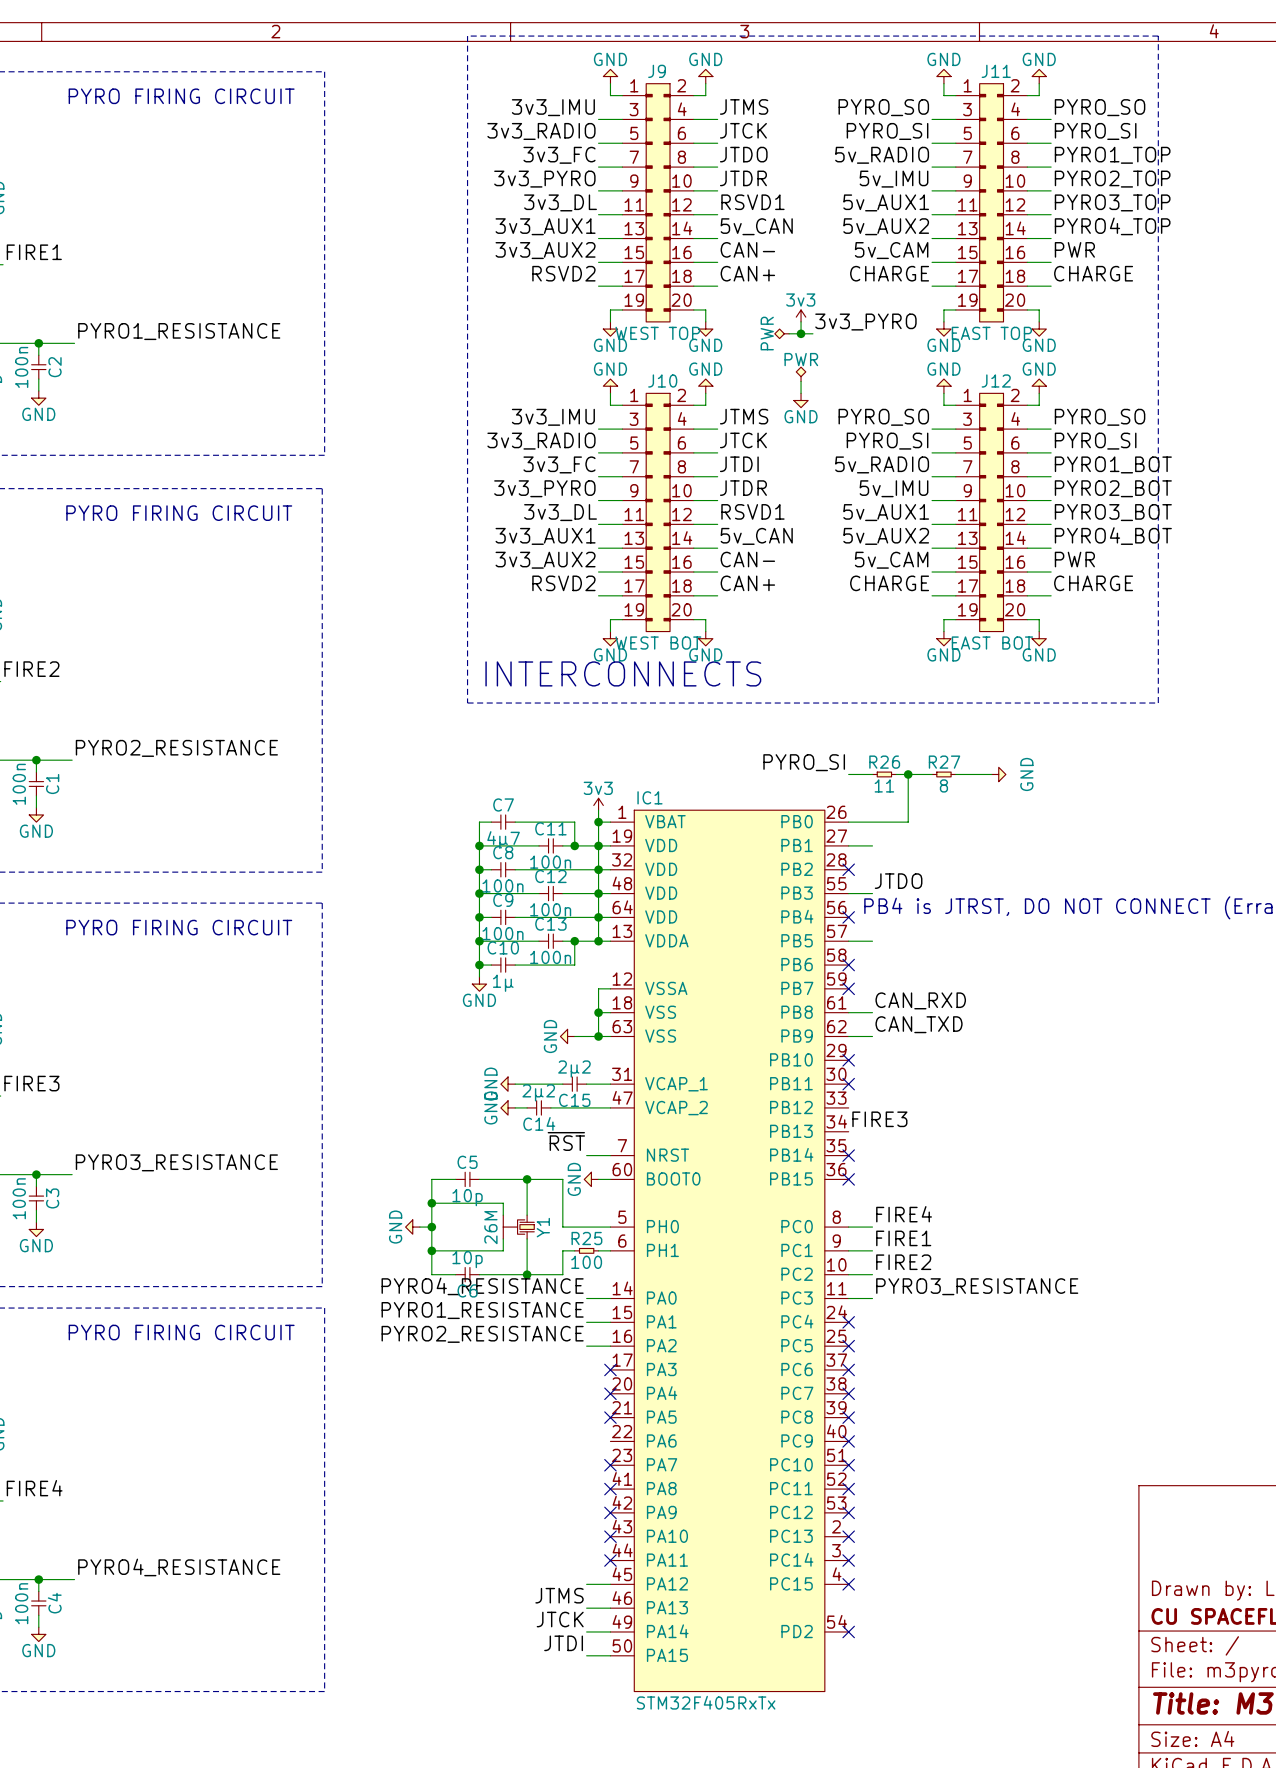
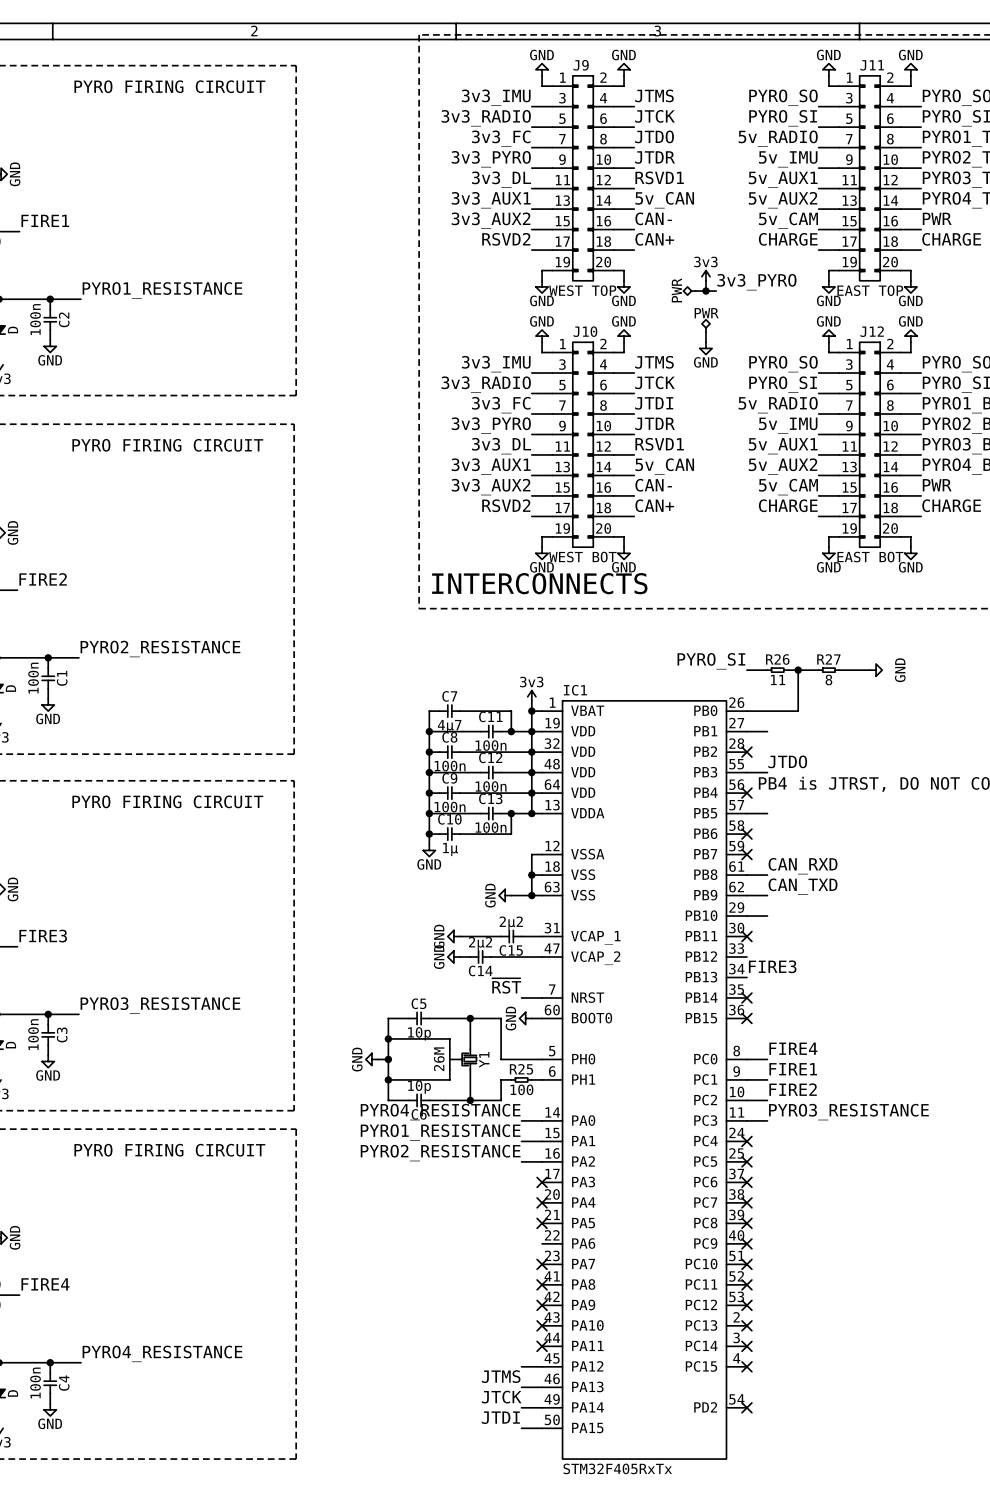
wire: none -> (746, 916) (767, 916)
no-connect mark: (848, 1060) -> none

